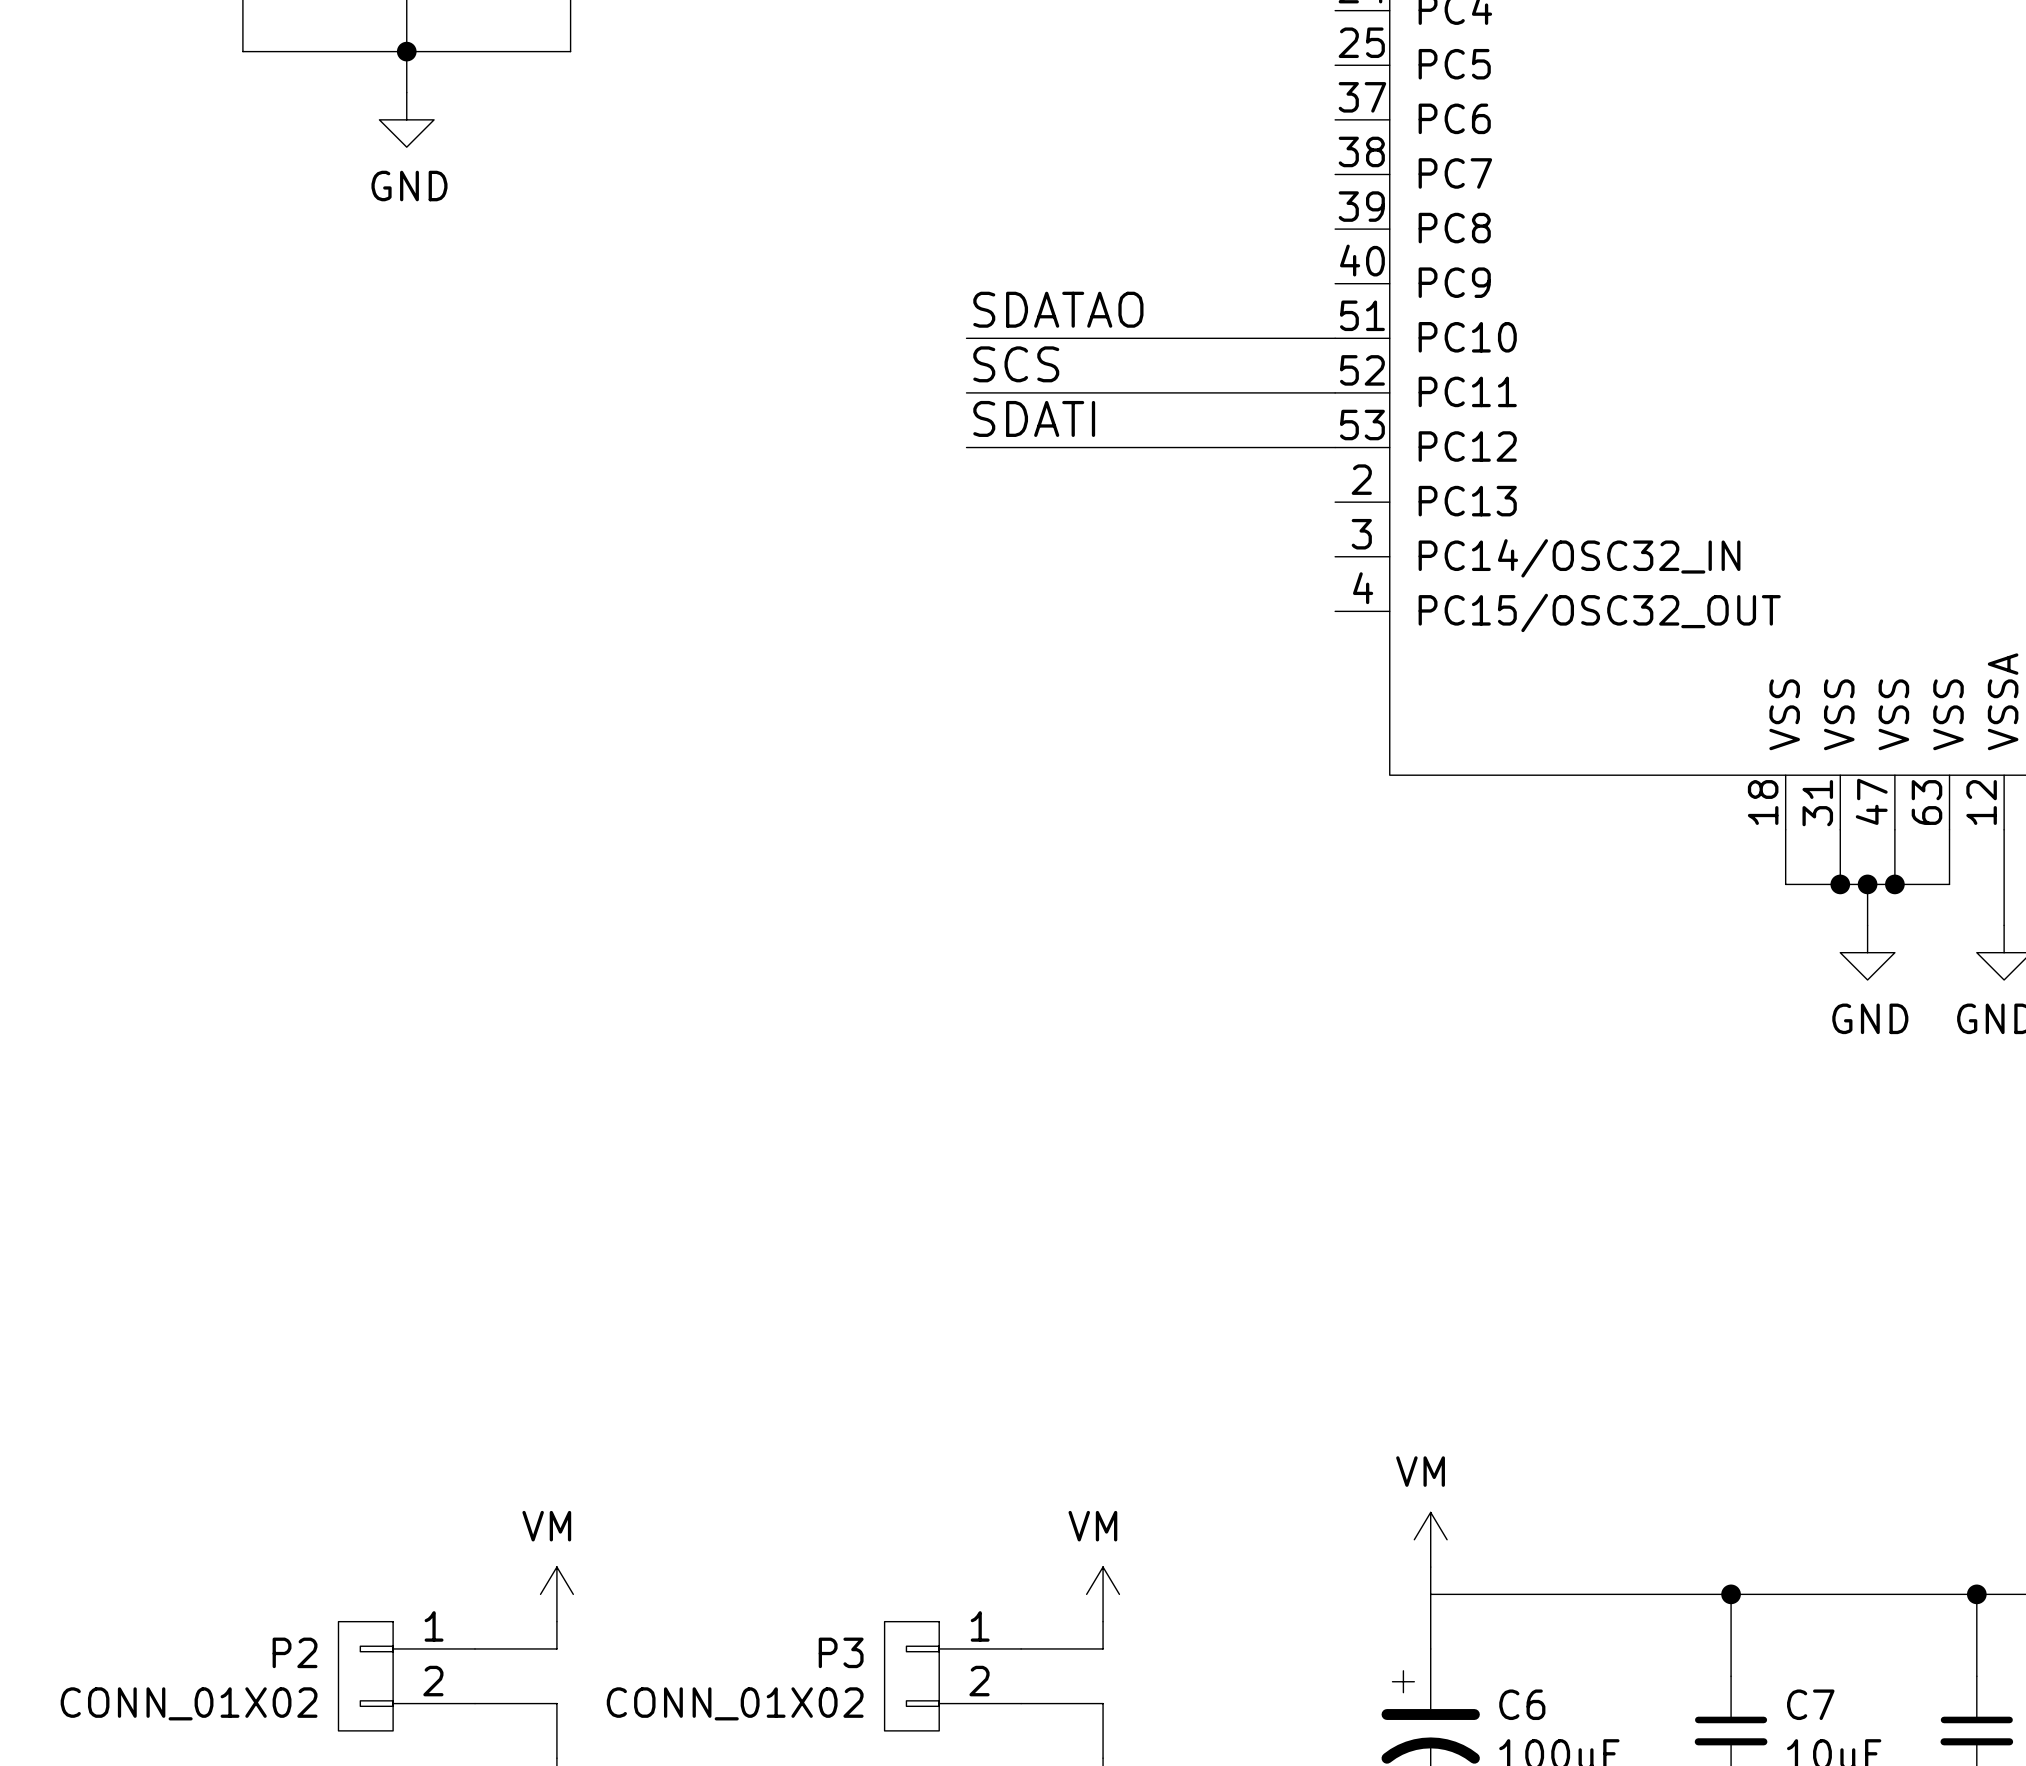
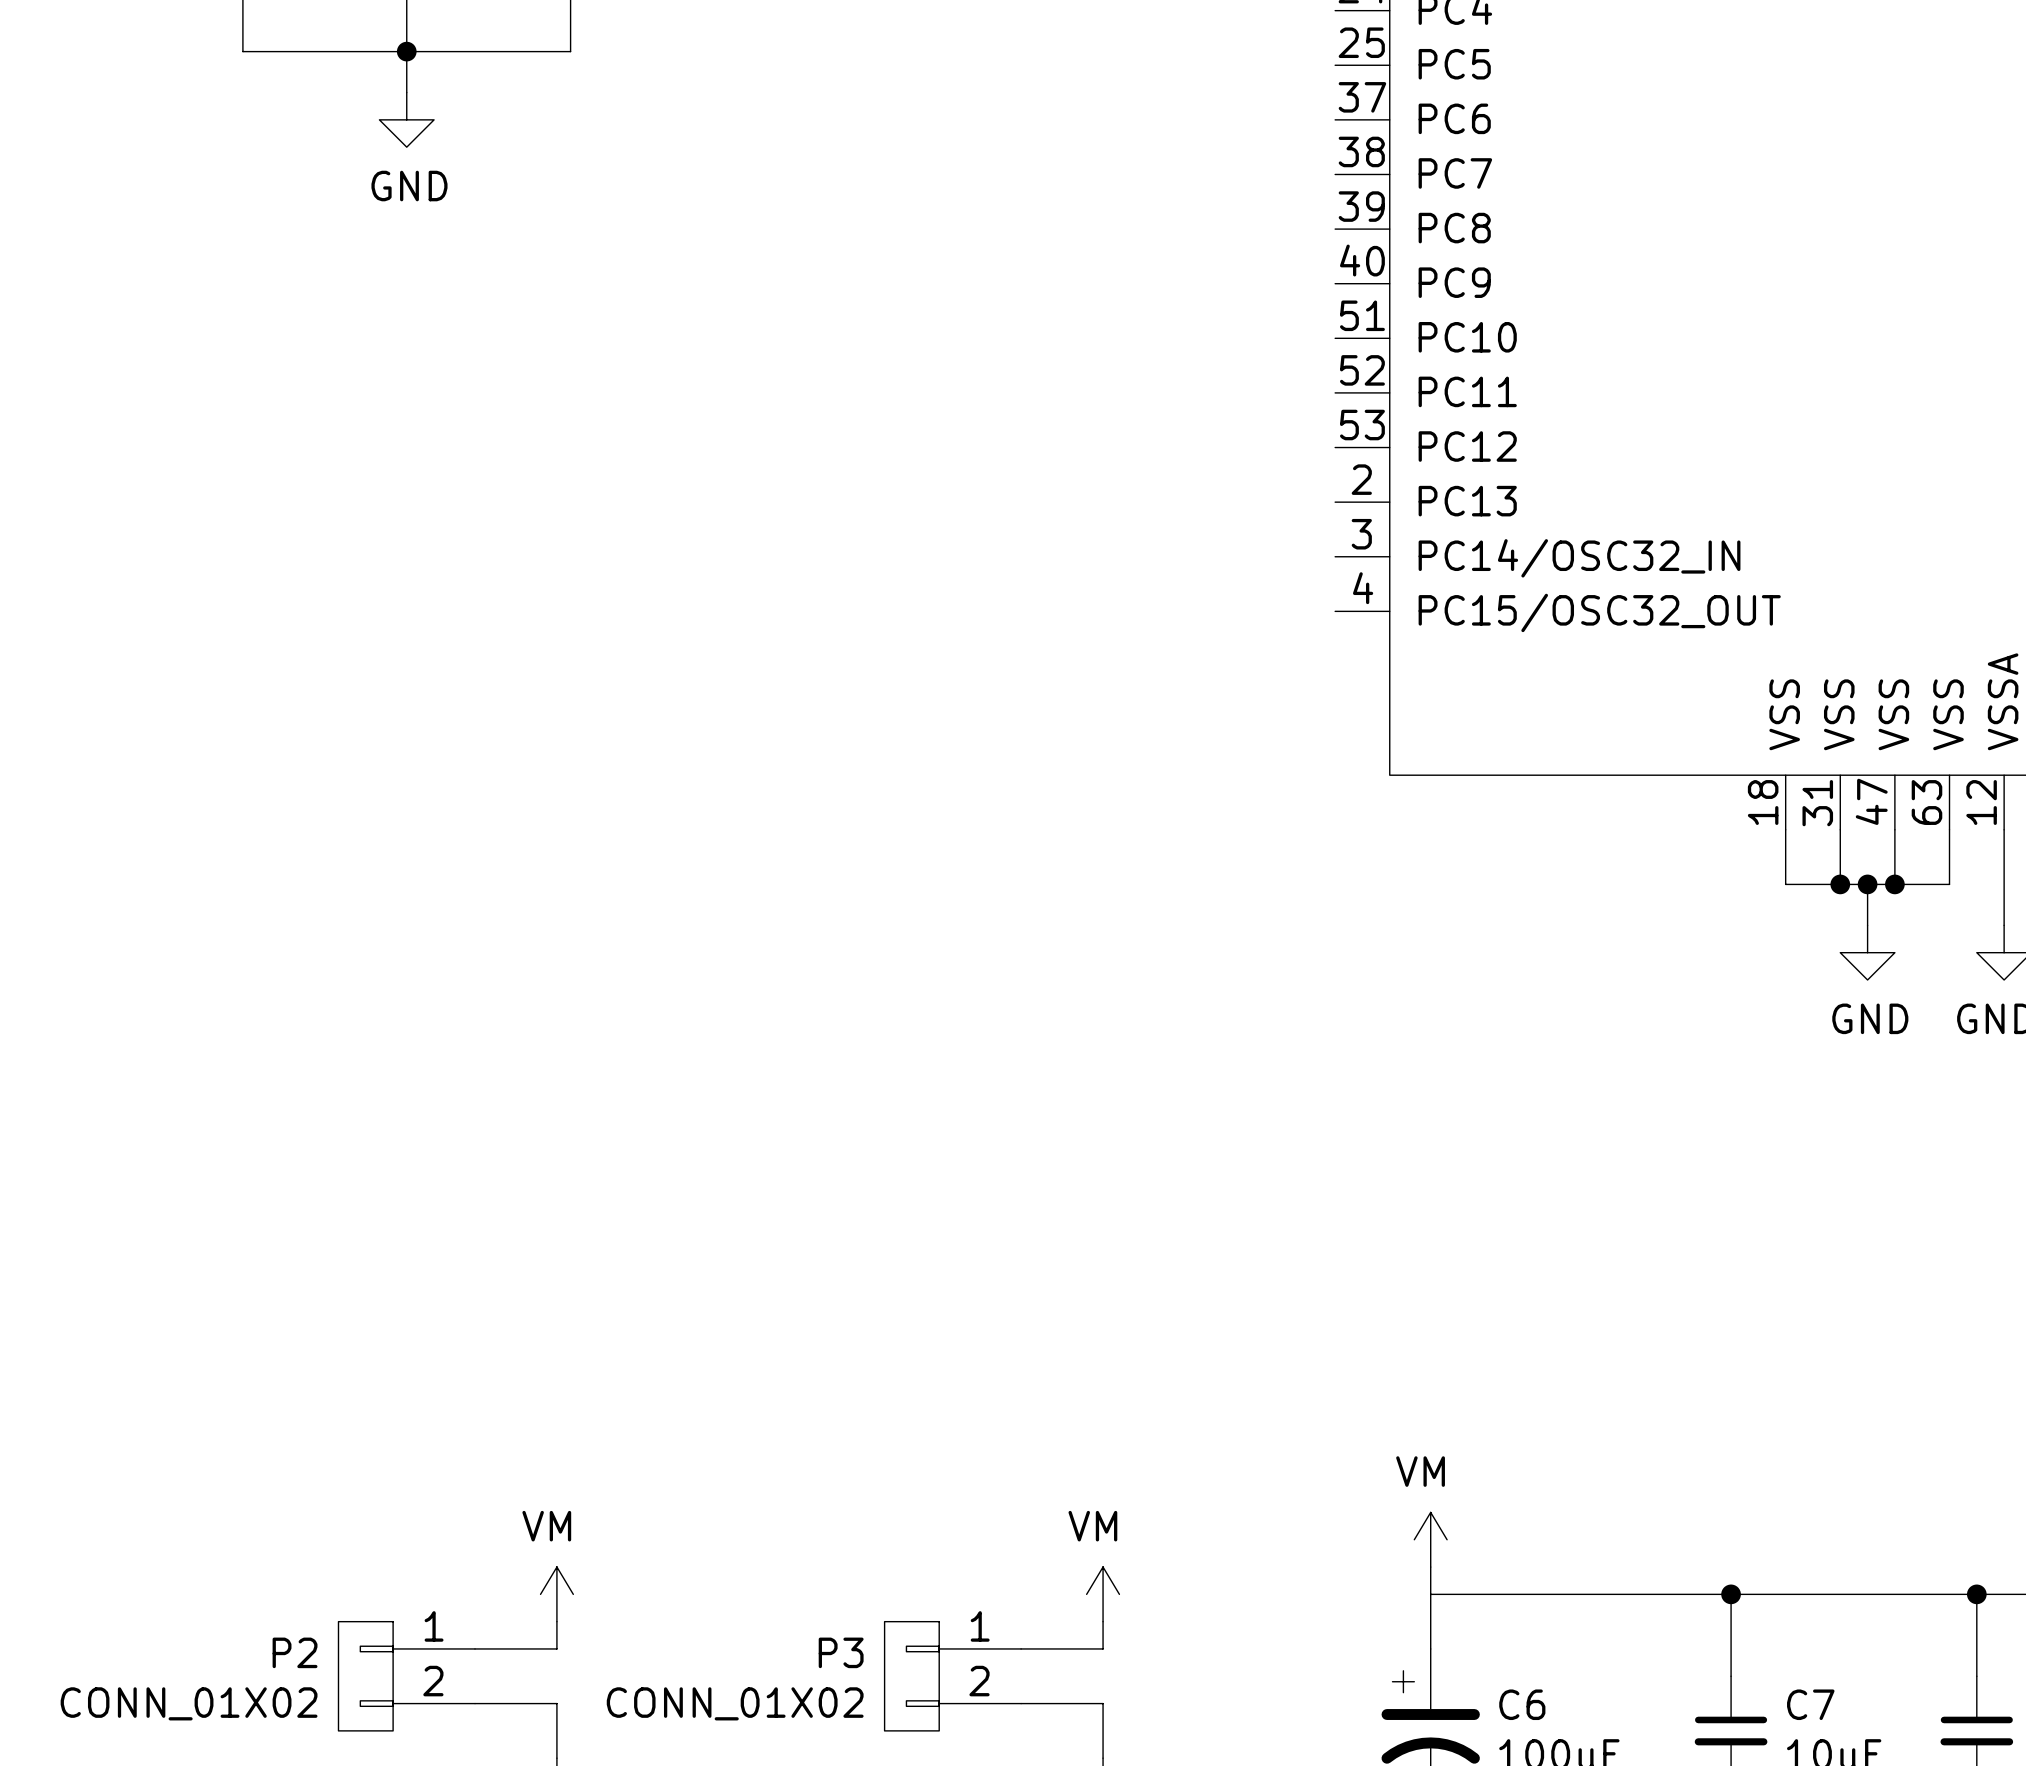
label: SDATAO (1058, 309) -> none
wire: (966, 338) (1335, 338) -> none
label: SCS (1016, 364) -> none
wire: (966, 392) (1335, 392) -> none
label: SDATI (1034, 418) -> none
wire: (966, 447) (1335, 447) -> none

